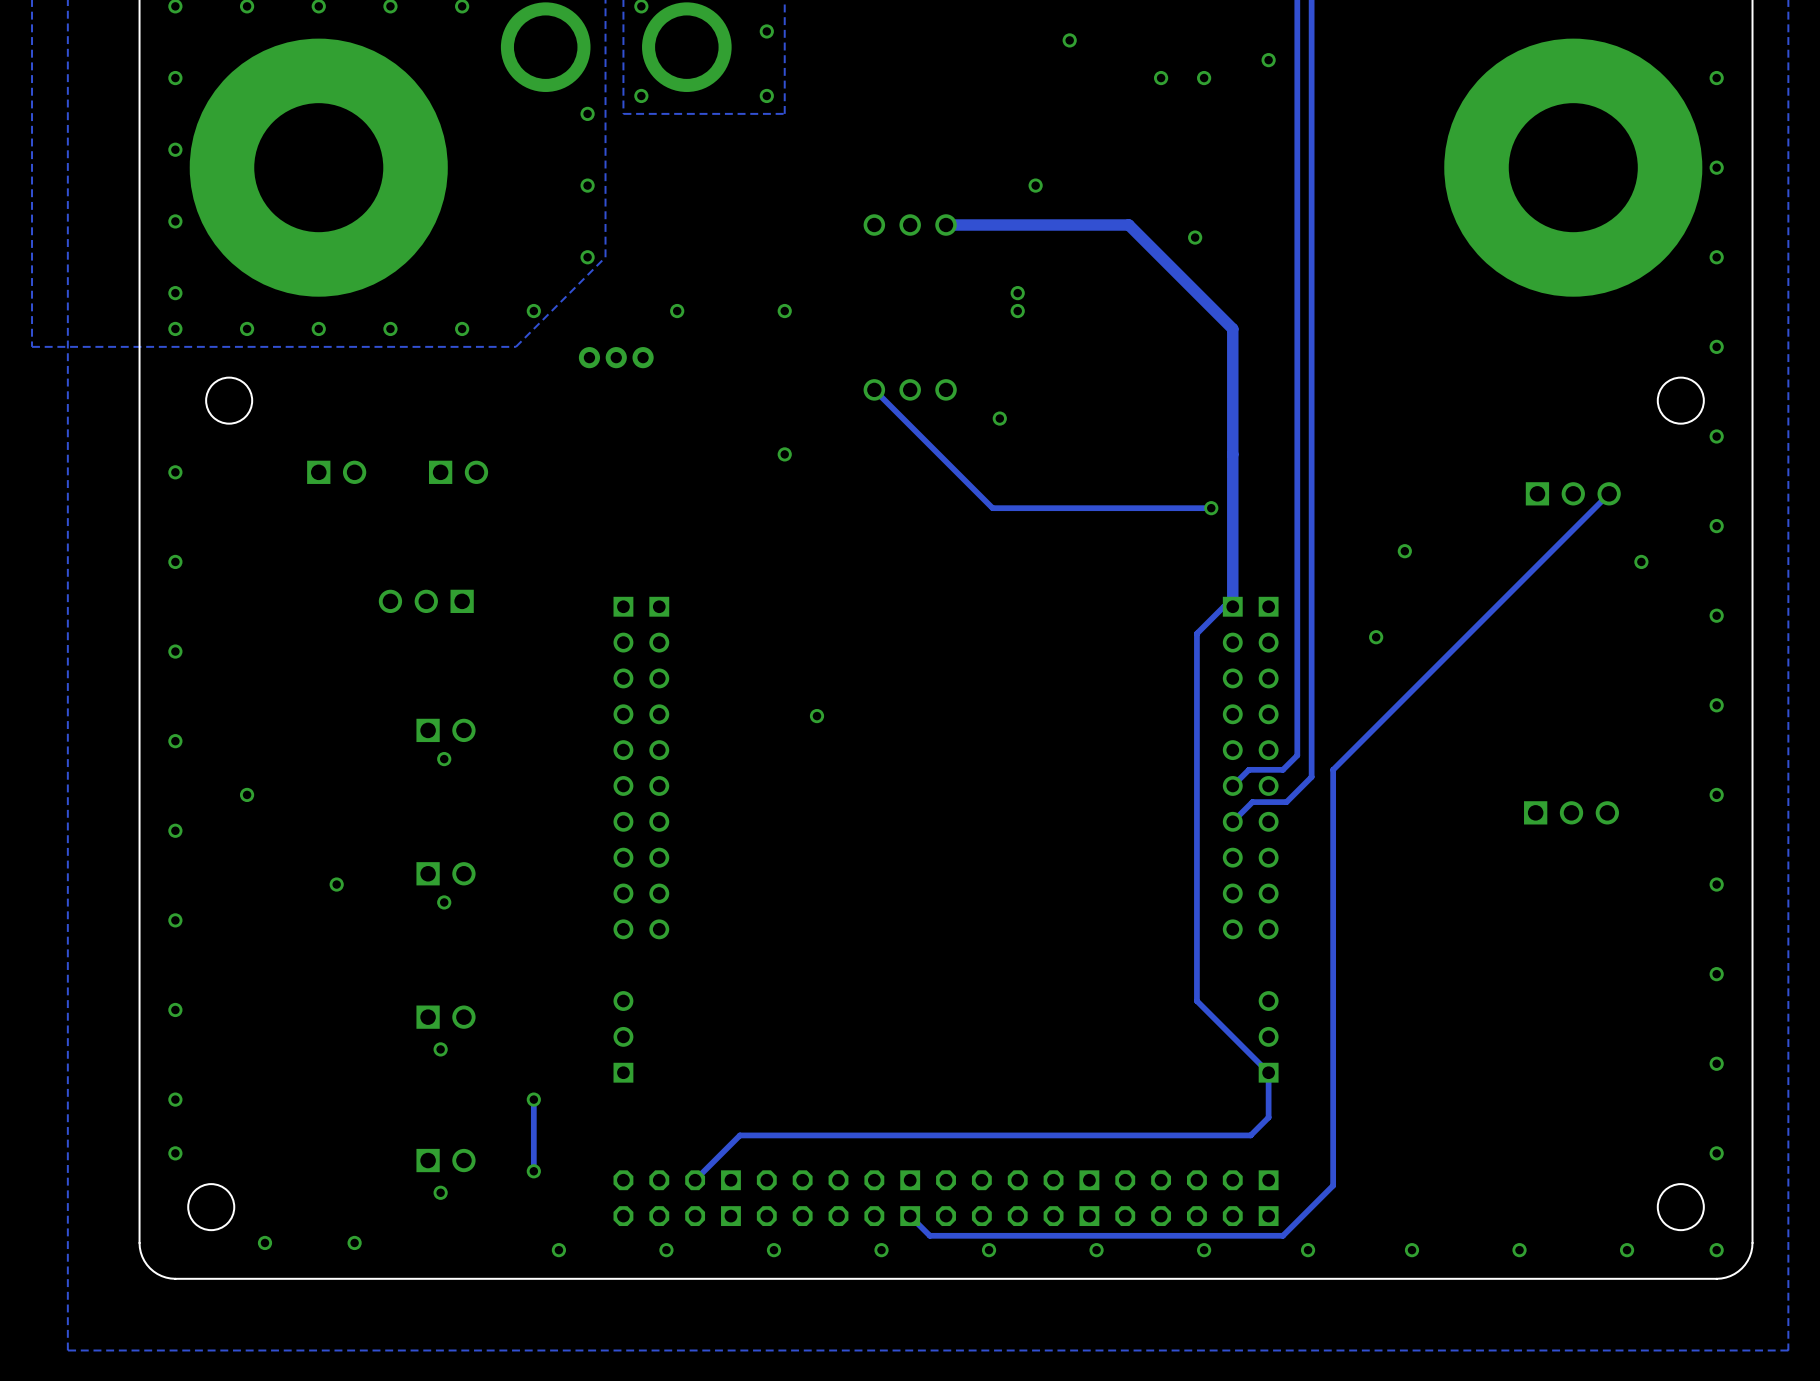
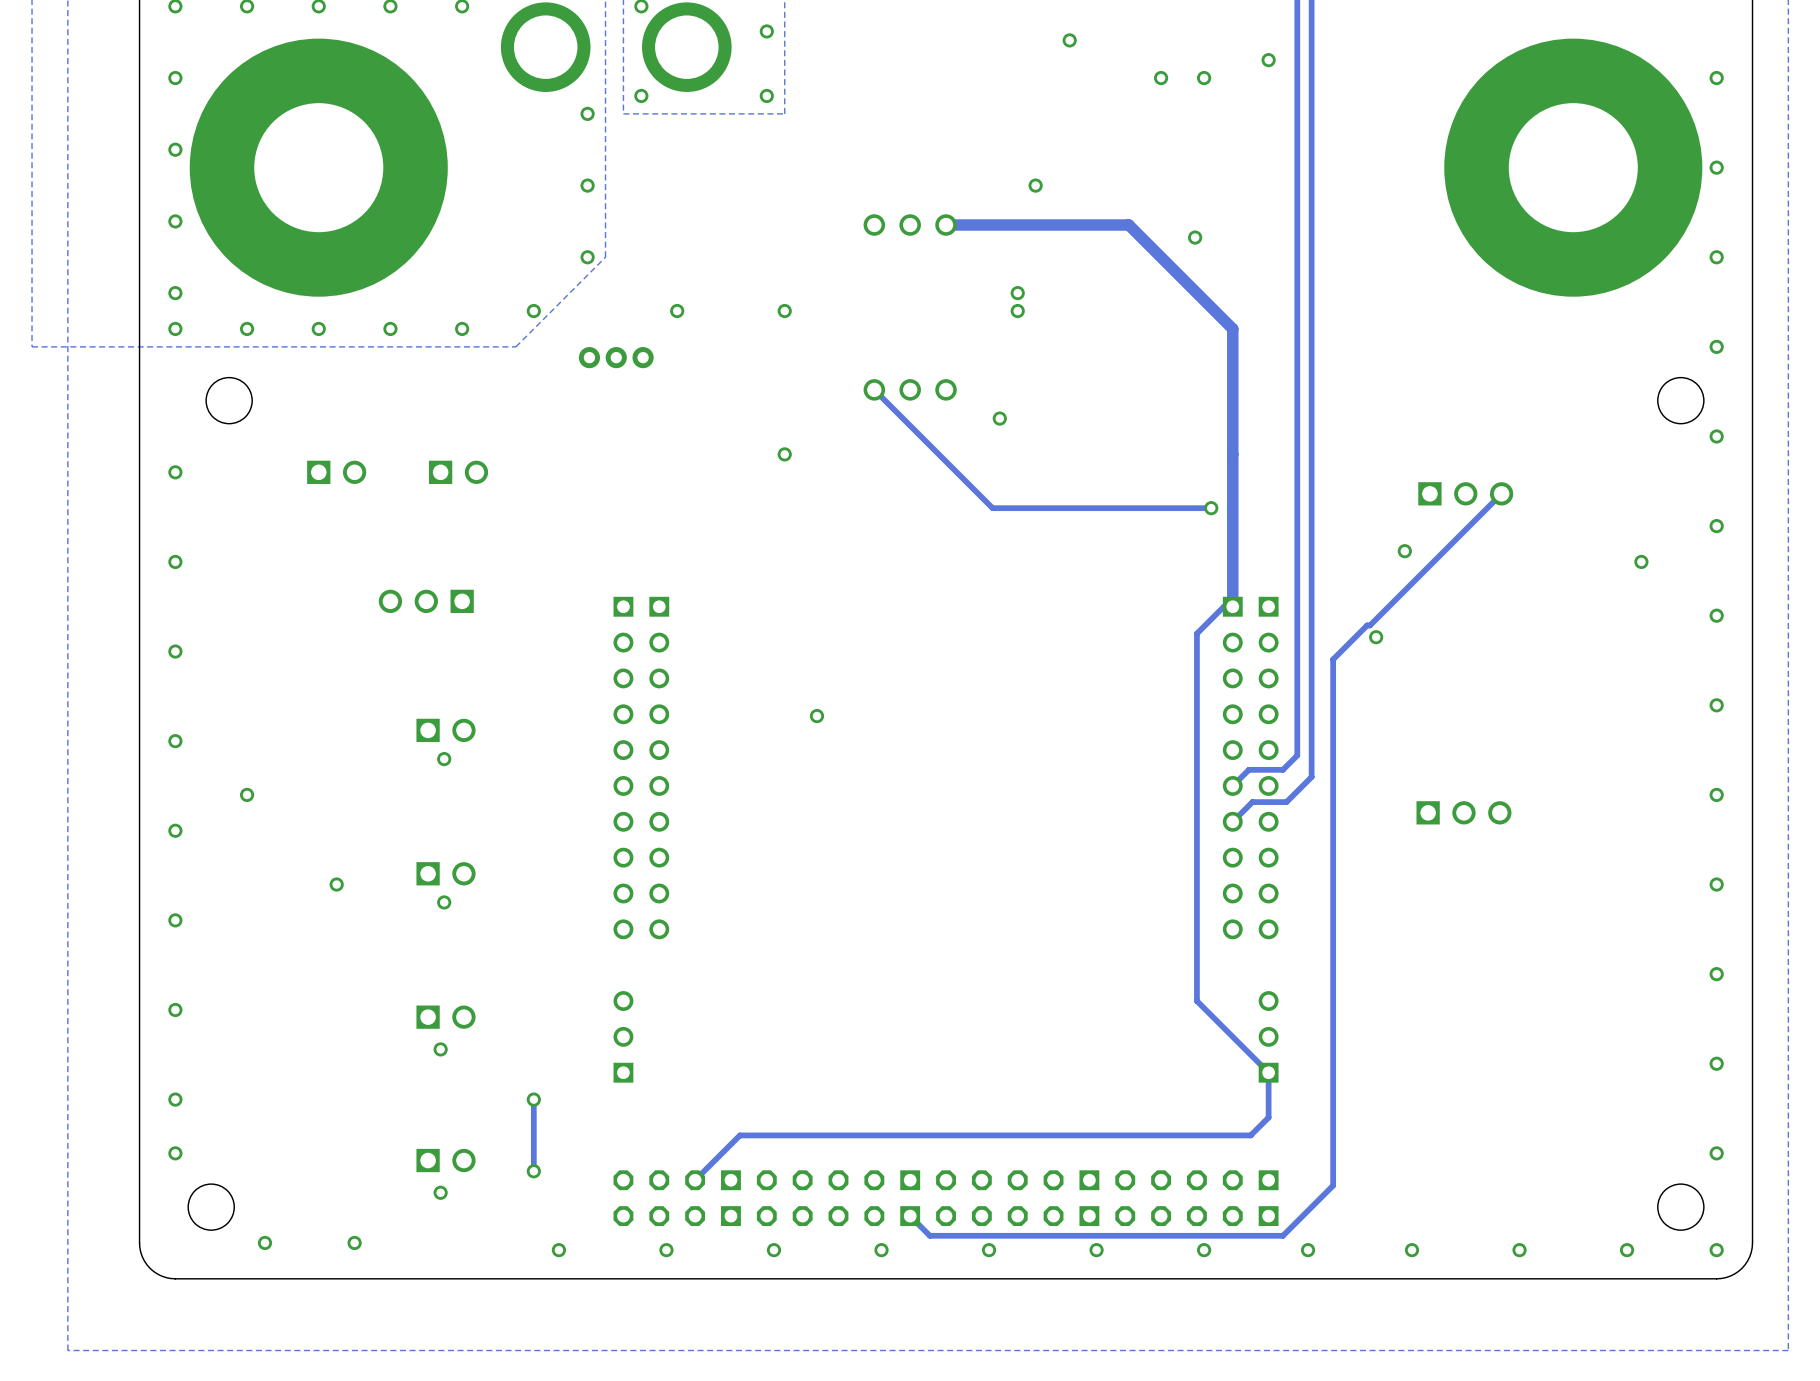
part position: (1573, 493) -> (1465, 493)
track: (1609, 493) (1333, 769) -> (1501, 493) (1369, 625) (1367, 625) (1333, 659) (1333, 769)
part position: (1571, 812) -> (1463, 812)

